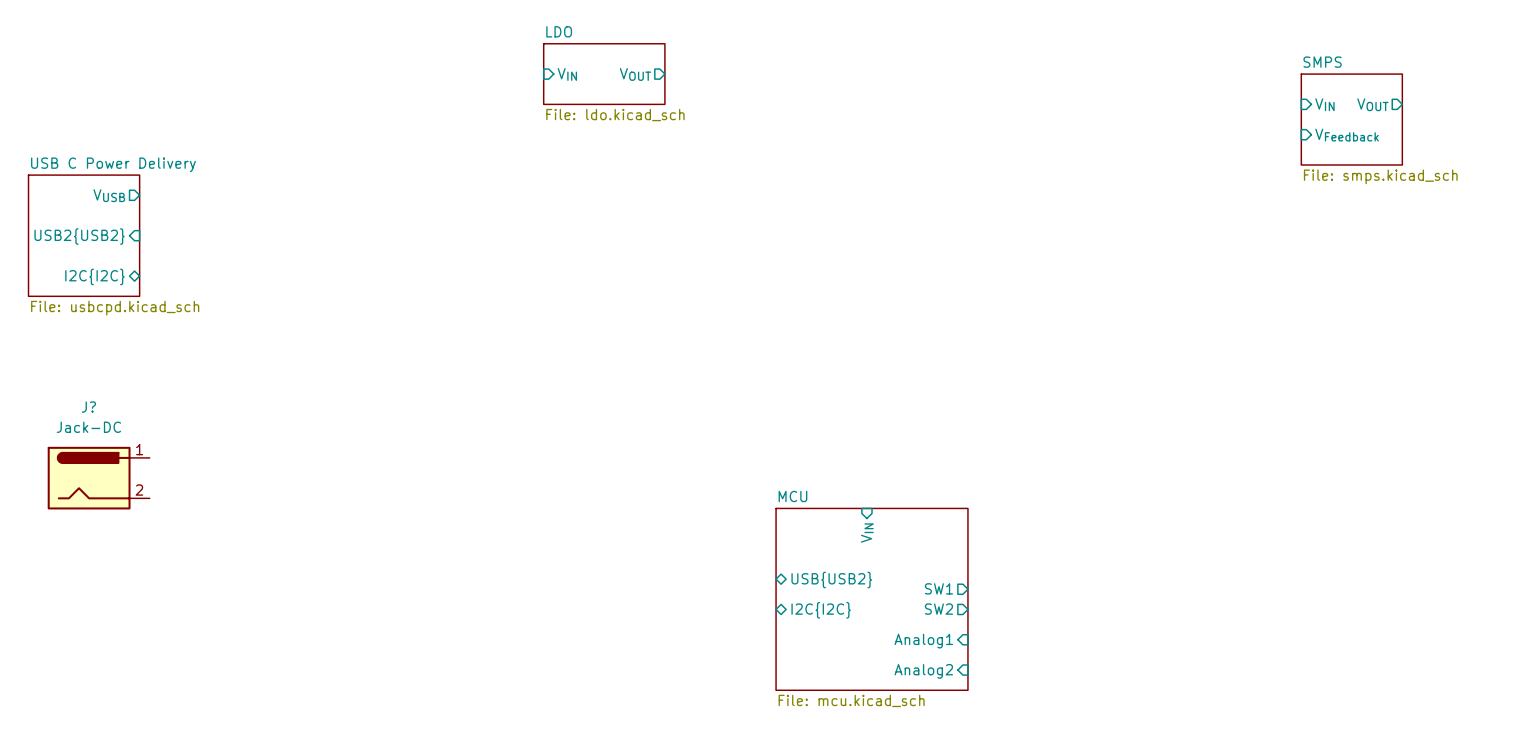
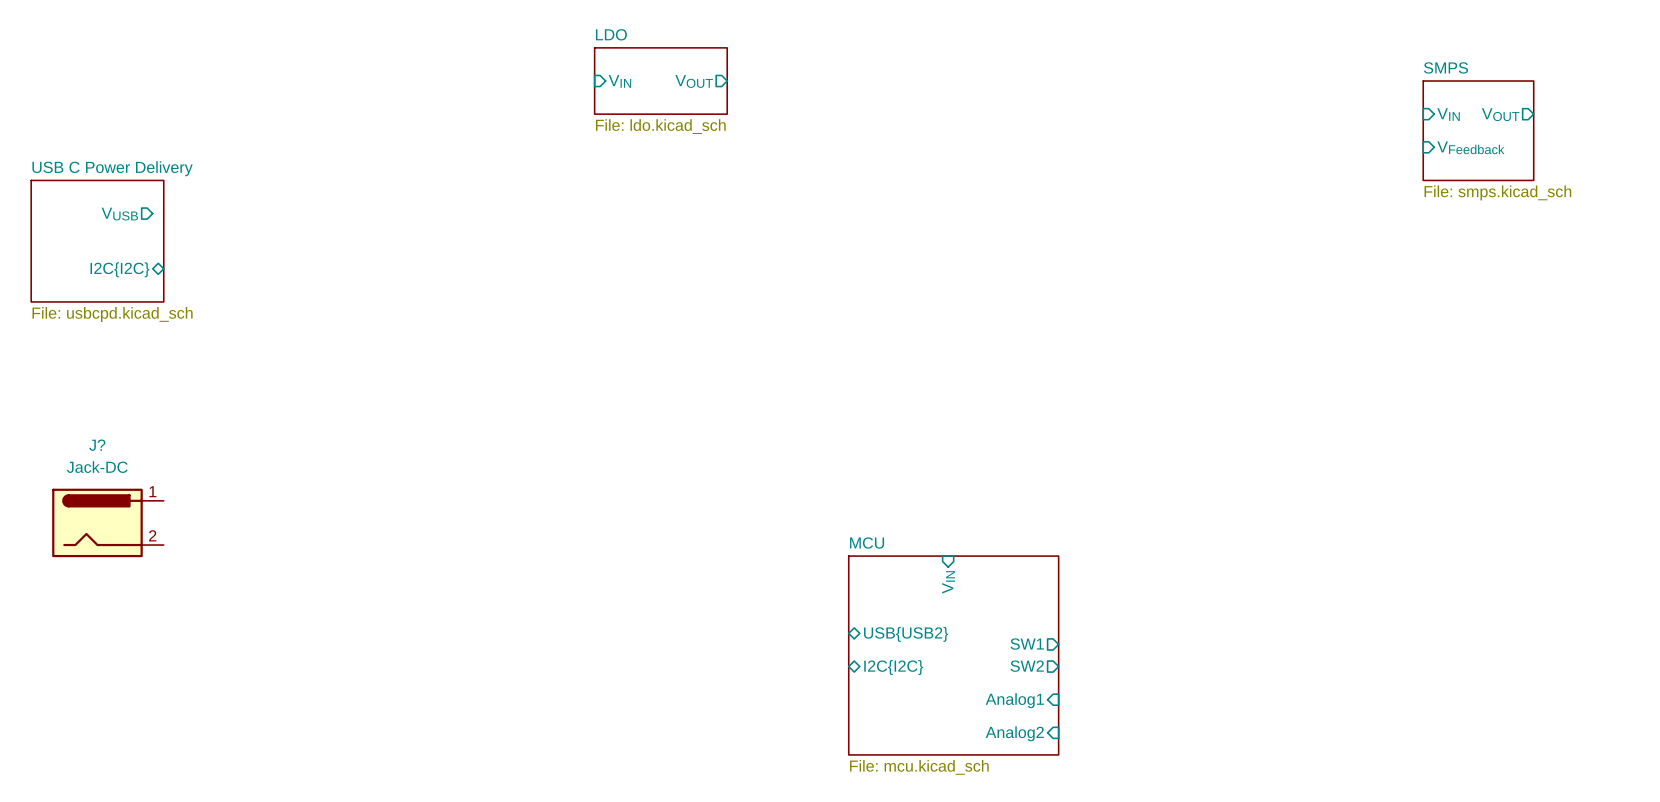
sheet USB C Power Delivery rotation: 0° (84, 235) -> 90° clockwise (97, 241)
sheet pin: USB2{USB2} (79, 236) -> none
sheet pin position: I2C{I2C} (94, 276) -> I2C{I2C} (119, 269)

